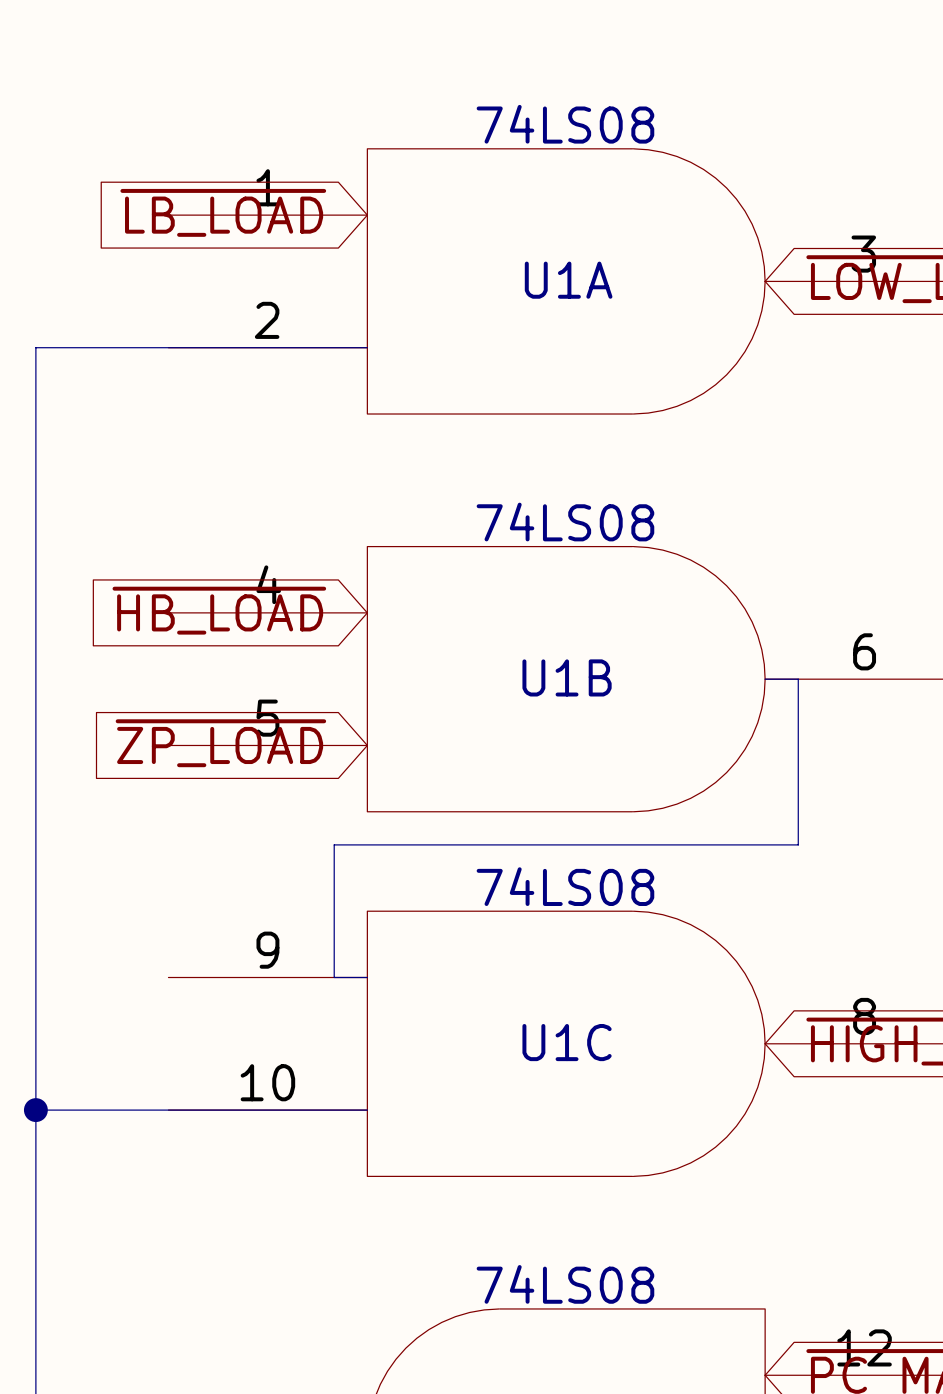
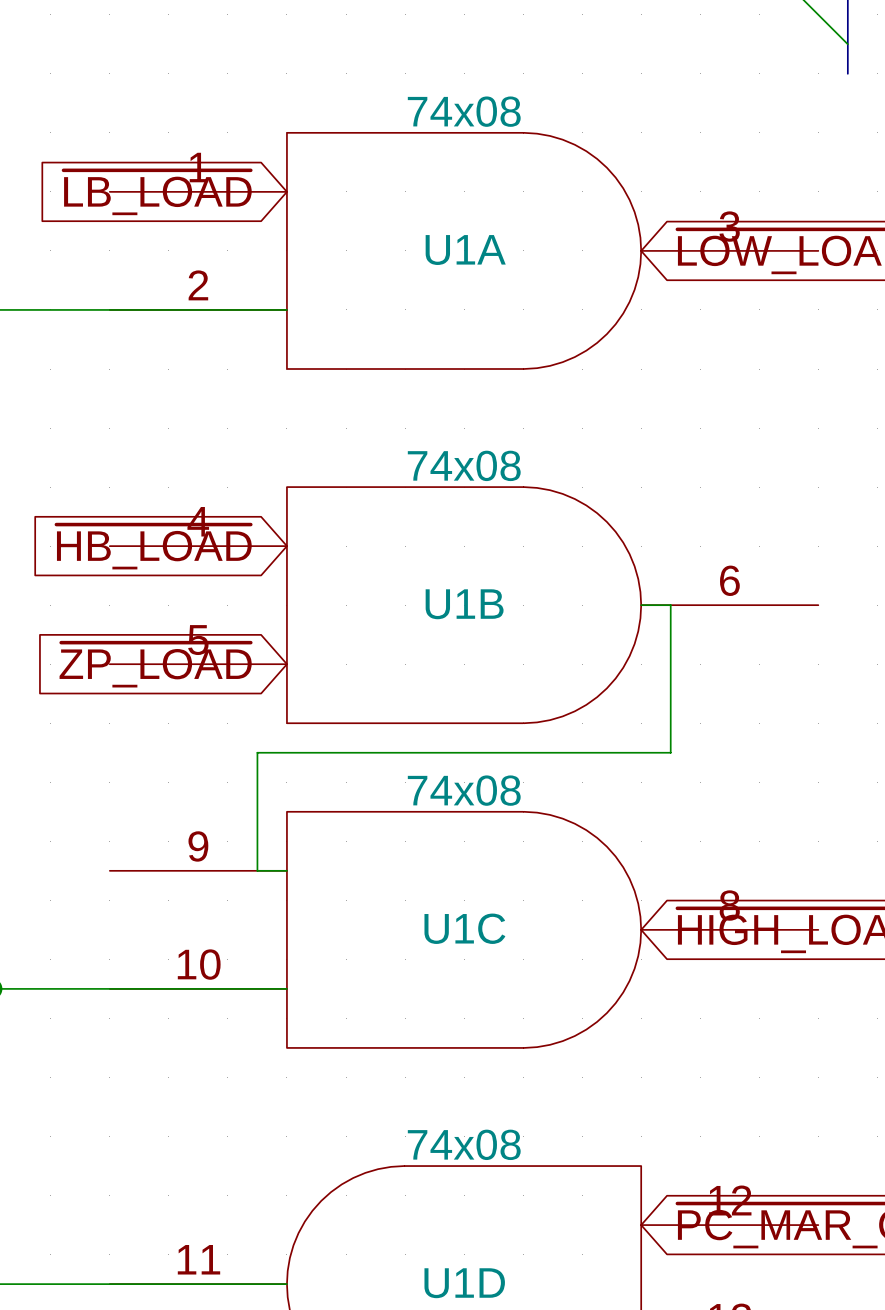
U1A value: 74LS08 (565, 124) -> 74x08 (464, 111)
U1B value: 74LS08 (565, 522) -> 74x08 (464, 465)
U1C value: 74LS08 (565, 886) -> 74x08 (464, 790)
U1D value: 74LS08 (565, 1284) -> 74x08 (464, 1144)

